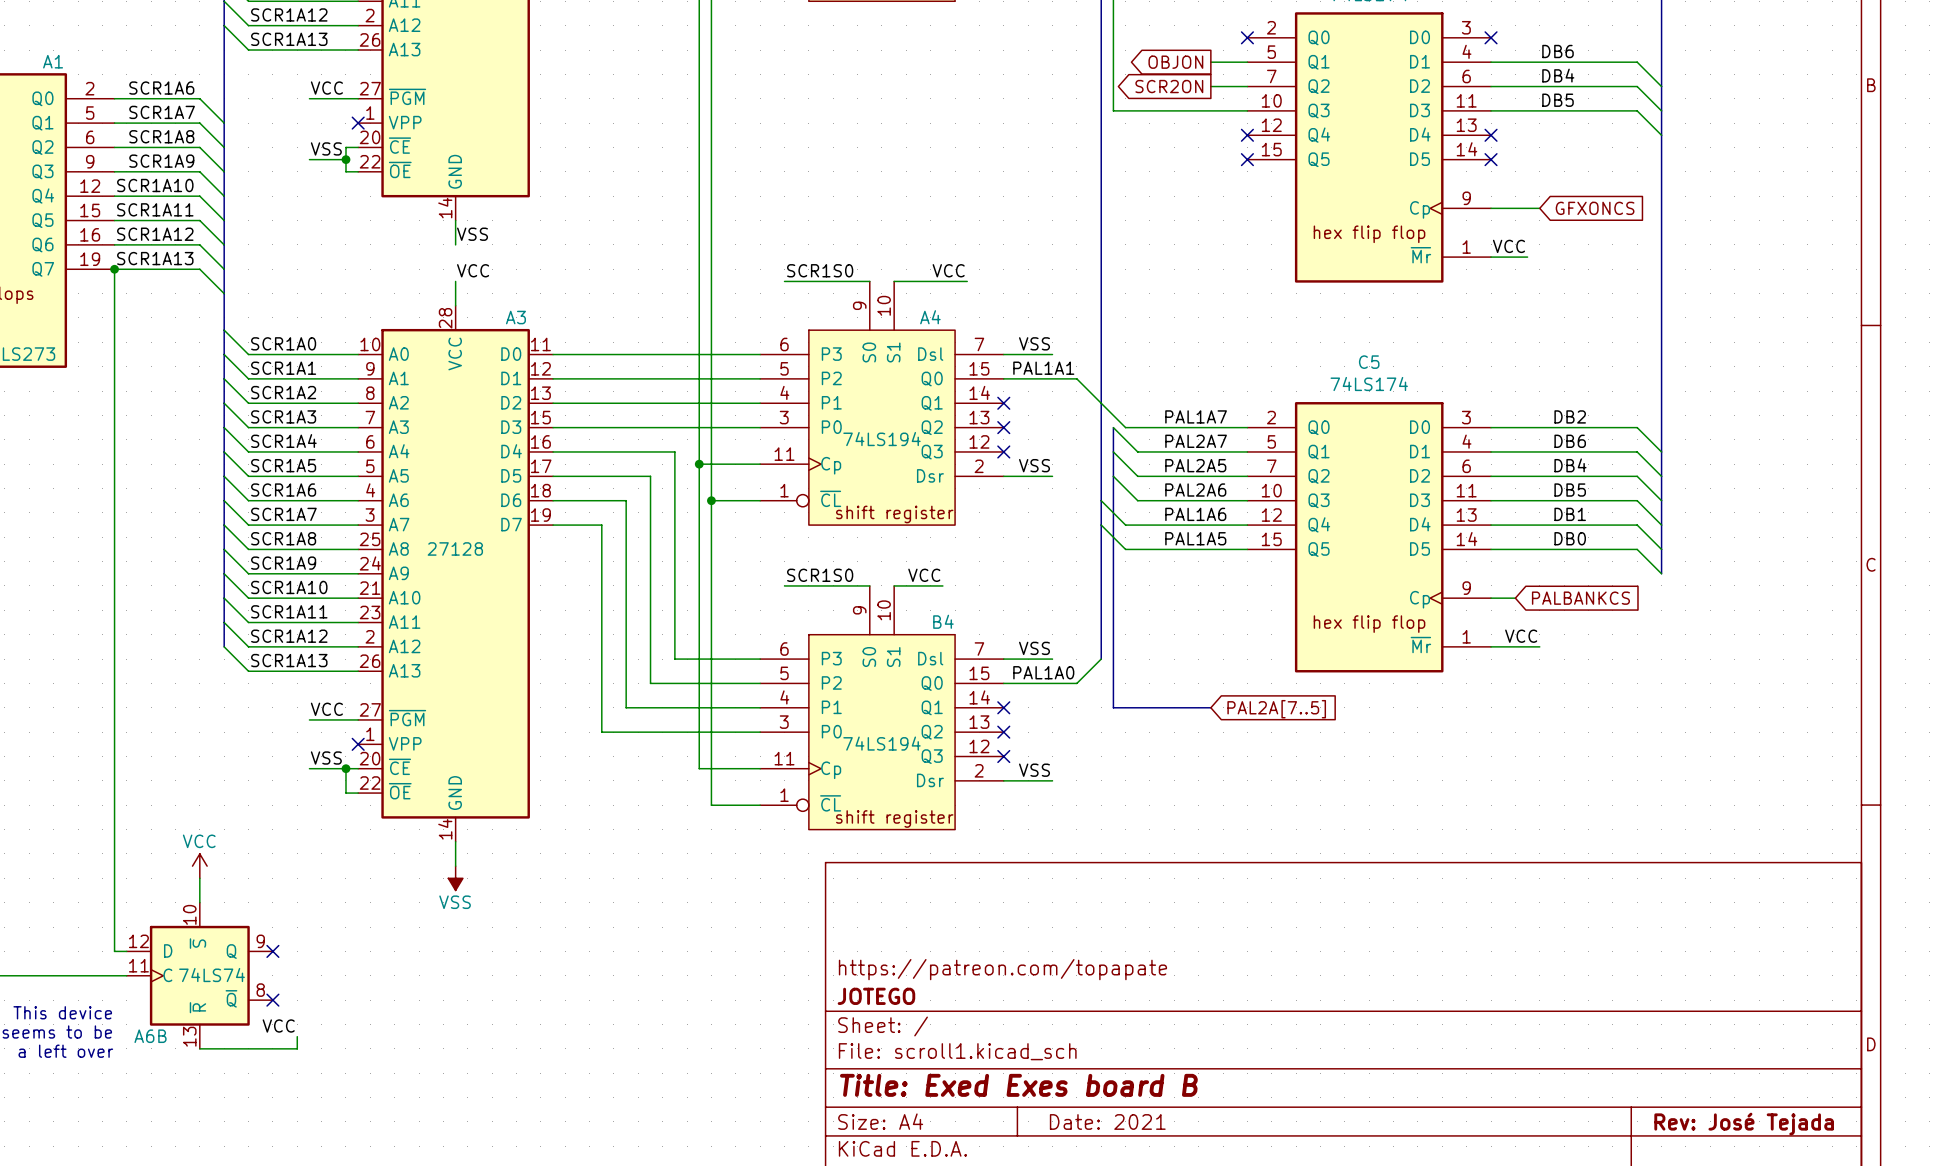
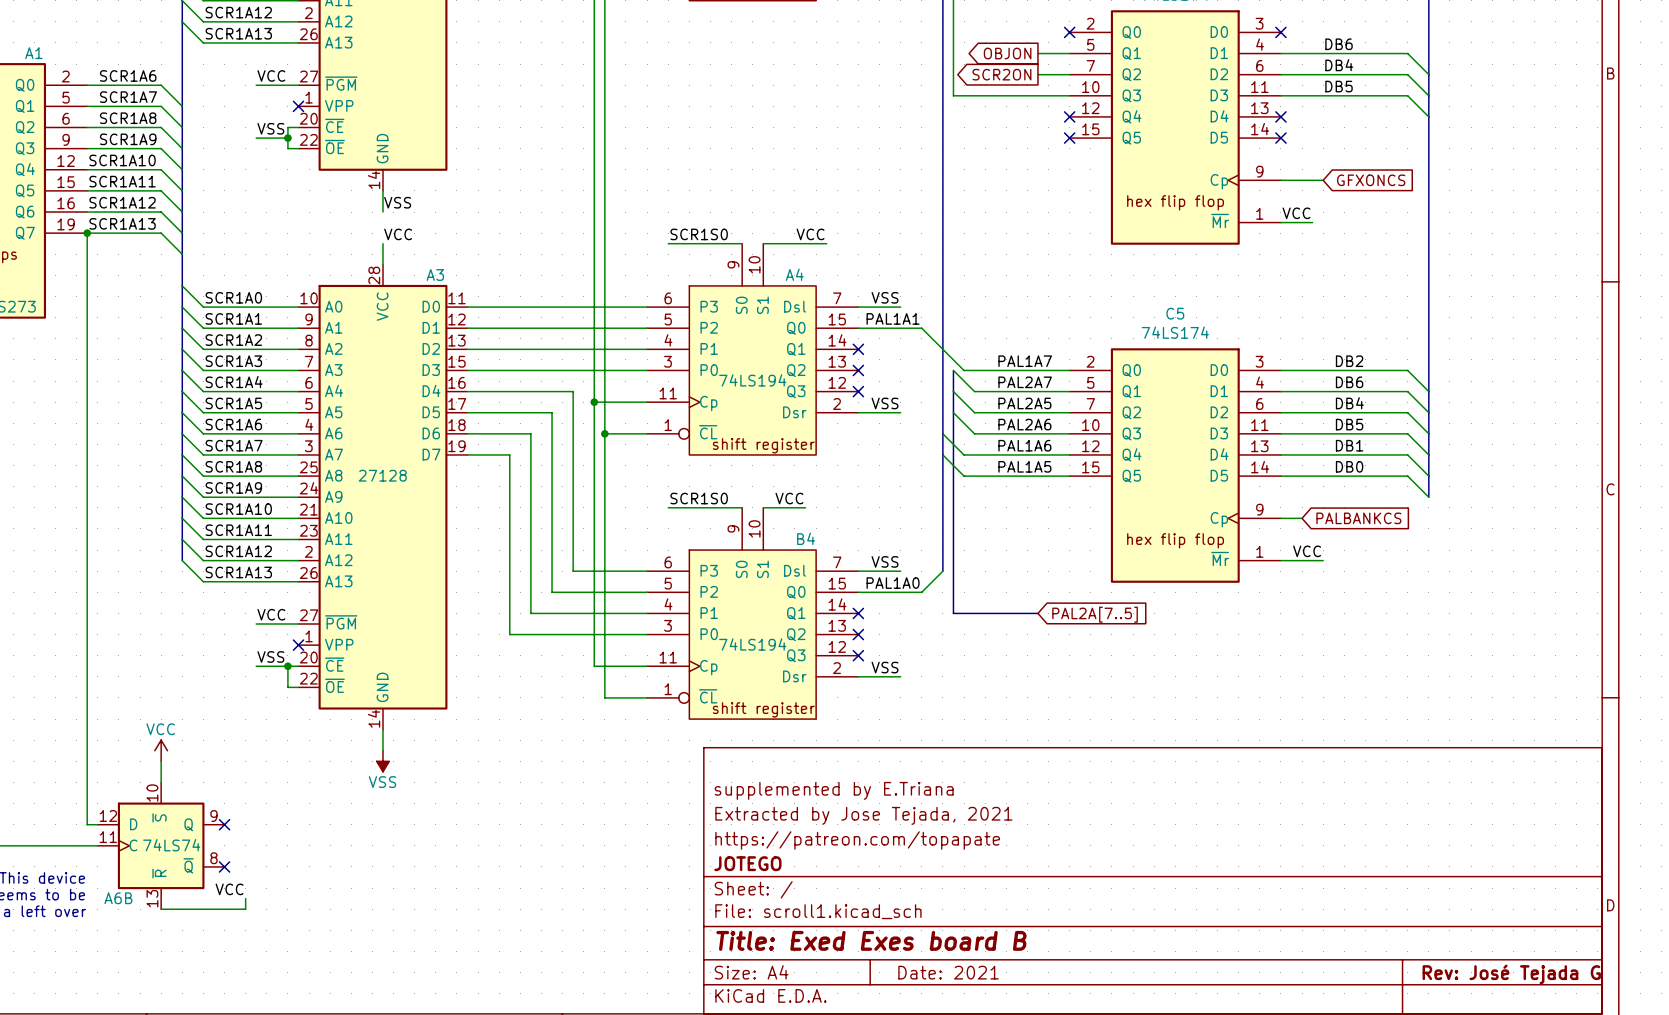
title block: none -> supplemented by E.Triana (834, 790)
title block: none -> Extracted by Jose Tejada, 2021 (863, 815)
title block: Rev: José Tejada (1744, 1124) -> Rev: José Tejada G (1511, 974)

